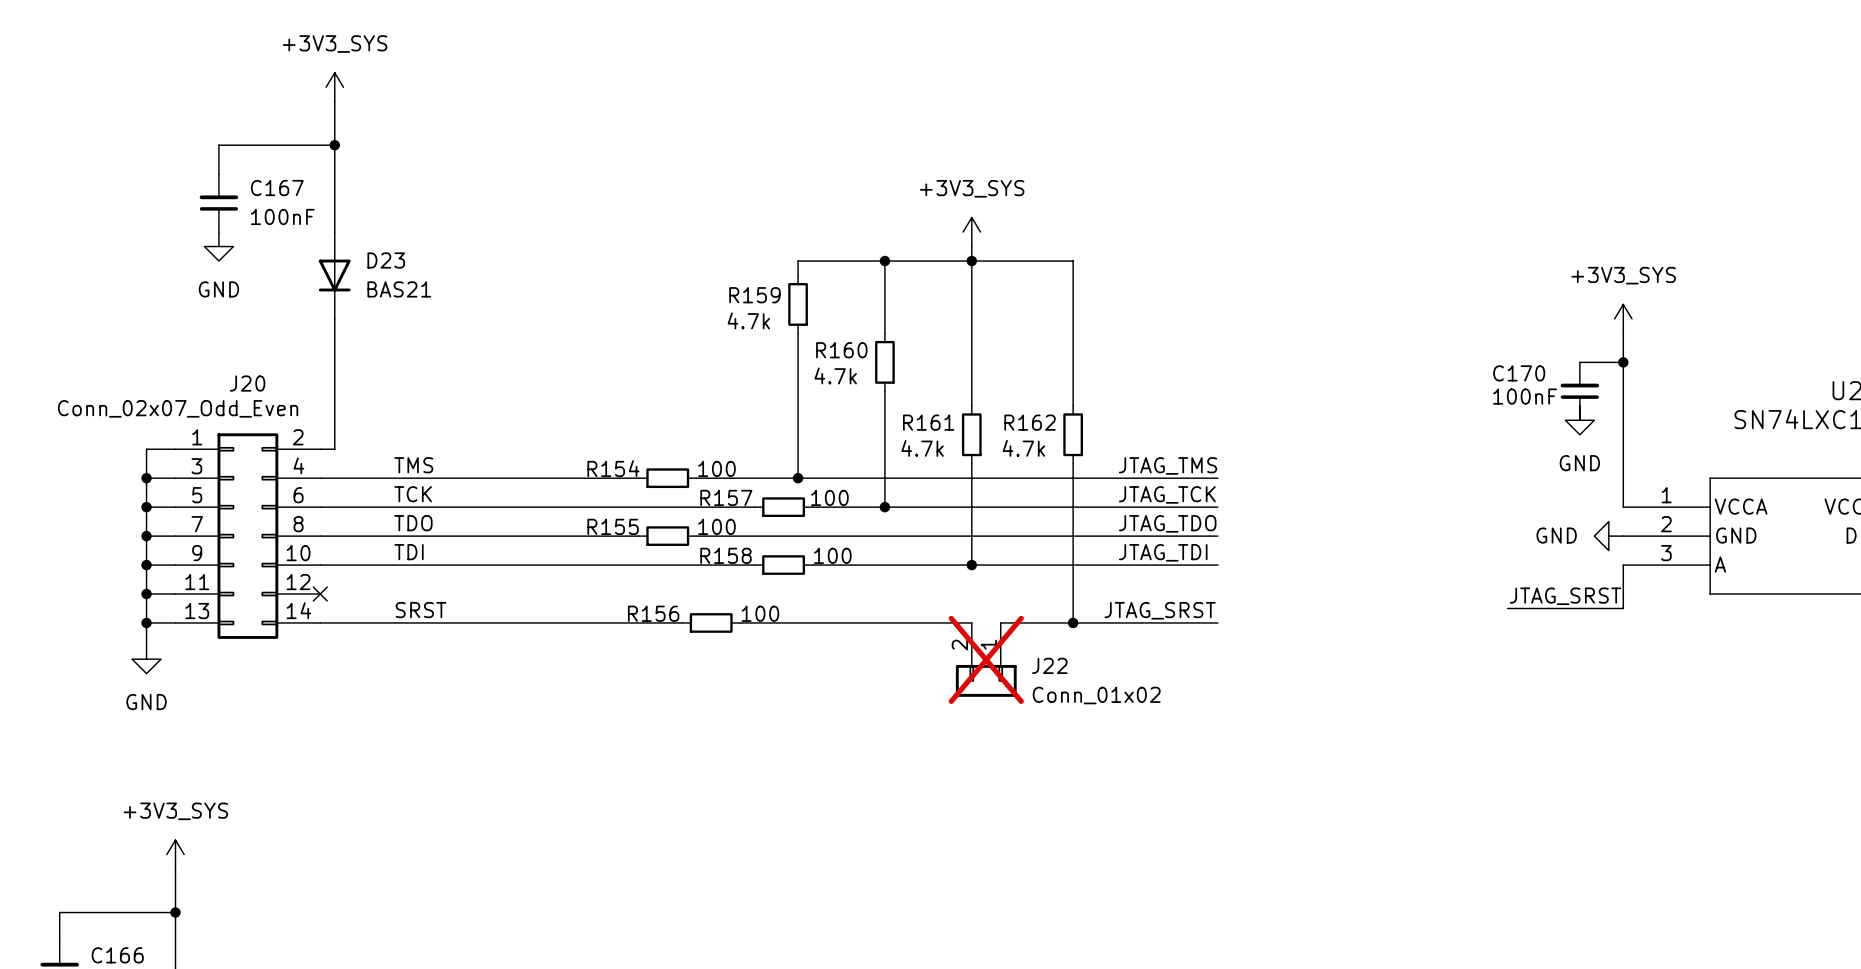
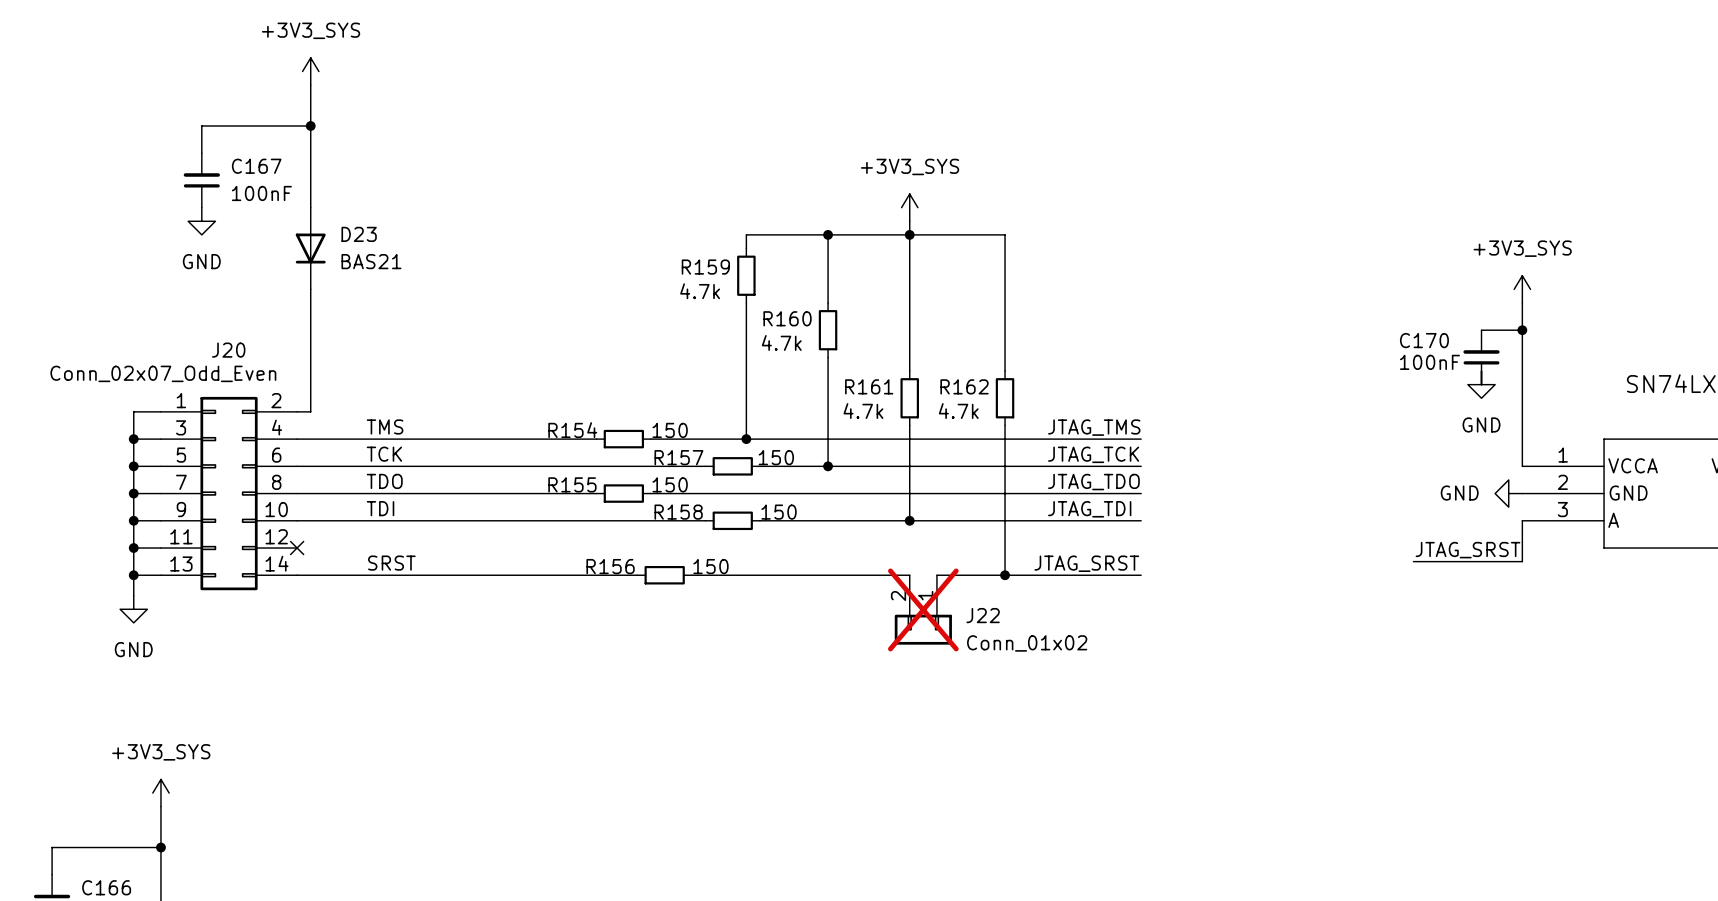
R154 value: 100 (716, 468) -> 150 (670, 430)
R157 value: 100 (829, 497) -> 150 (776, 457)
R155 value: 100 (716, 526) -> 150 (670, 484)
R158 value: 100 (832, 555) -> 150 (779, 512)
R156 value: 100 (760, 613) -> 150 (710, 566)

